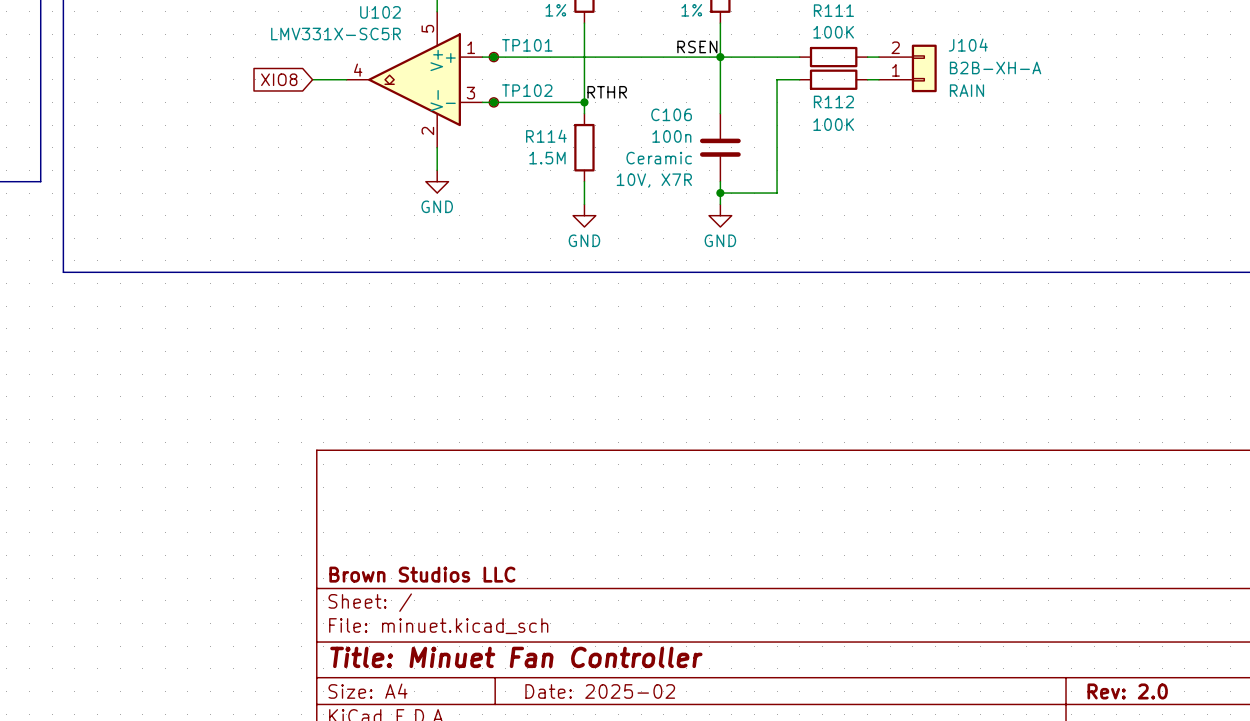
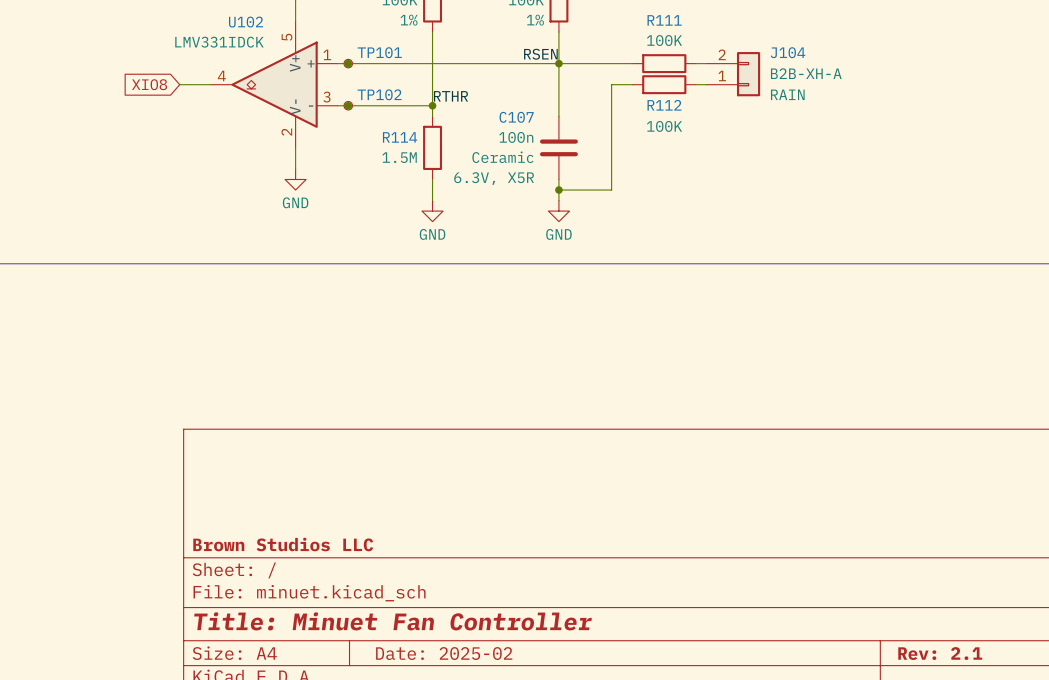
U102 value: LMV331X-SC5R (335, 34) -> LMV331IDCK (219, 42)
C106 name: C106 (671, 114) -> C107 (516, 117)
C106 text: 10V, X7R (654, 180) -> 6.3V, X5R (494, 178)
title block: Rev: 2.0 (1127, 691) -> Rev: 2.1 (940, 653)

